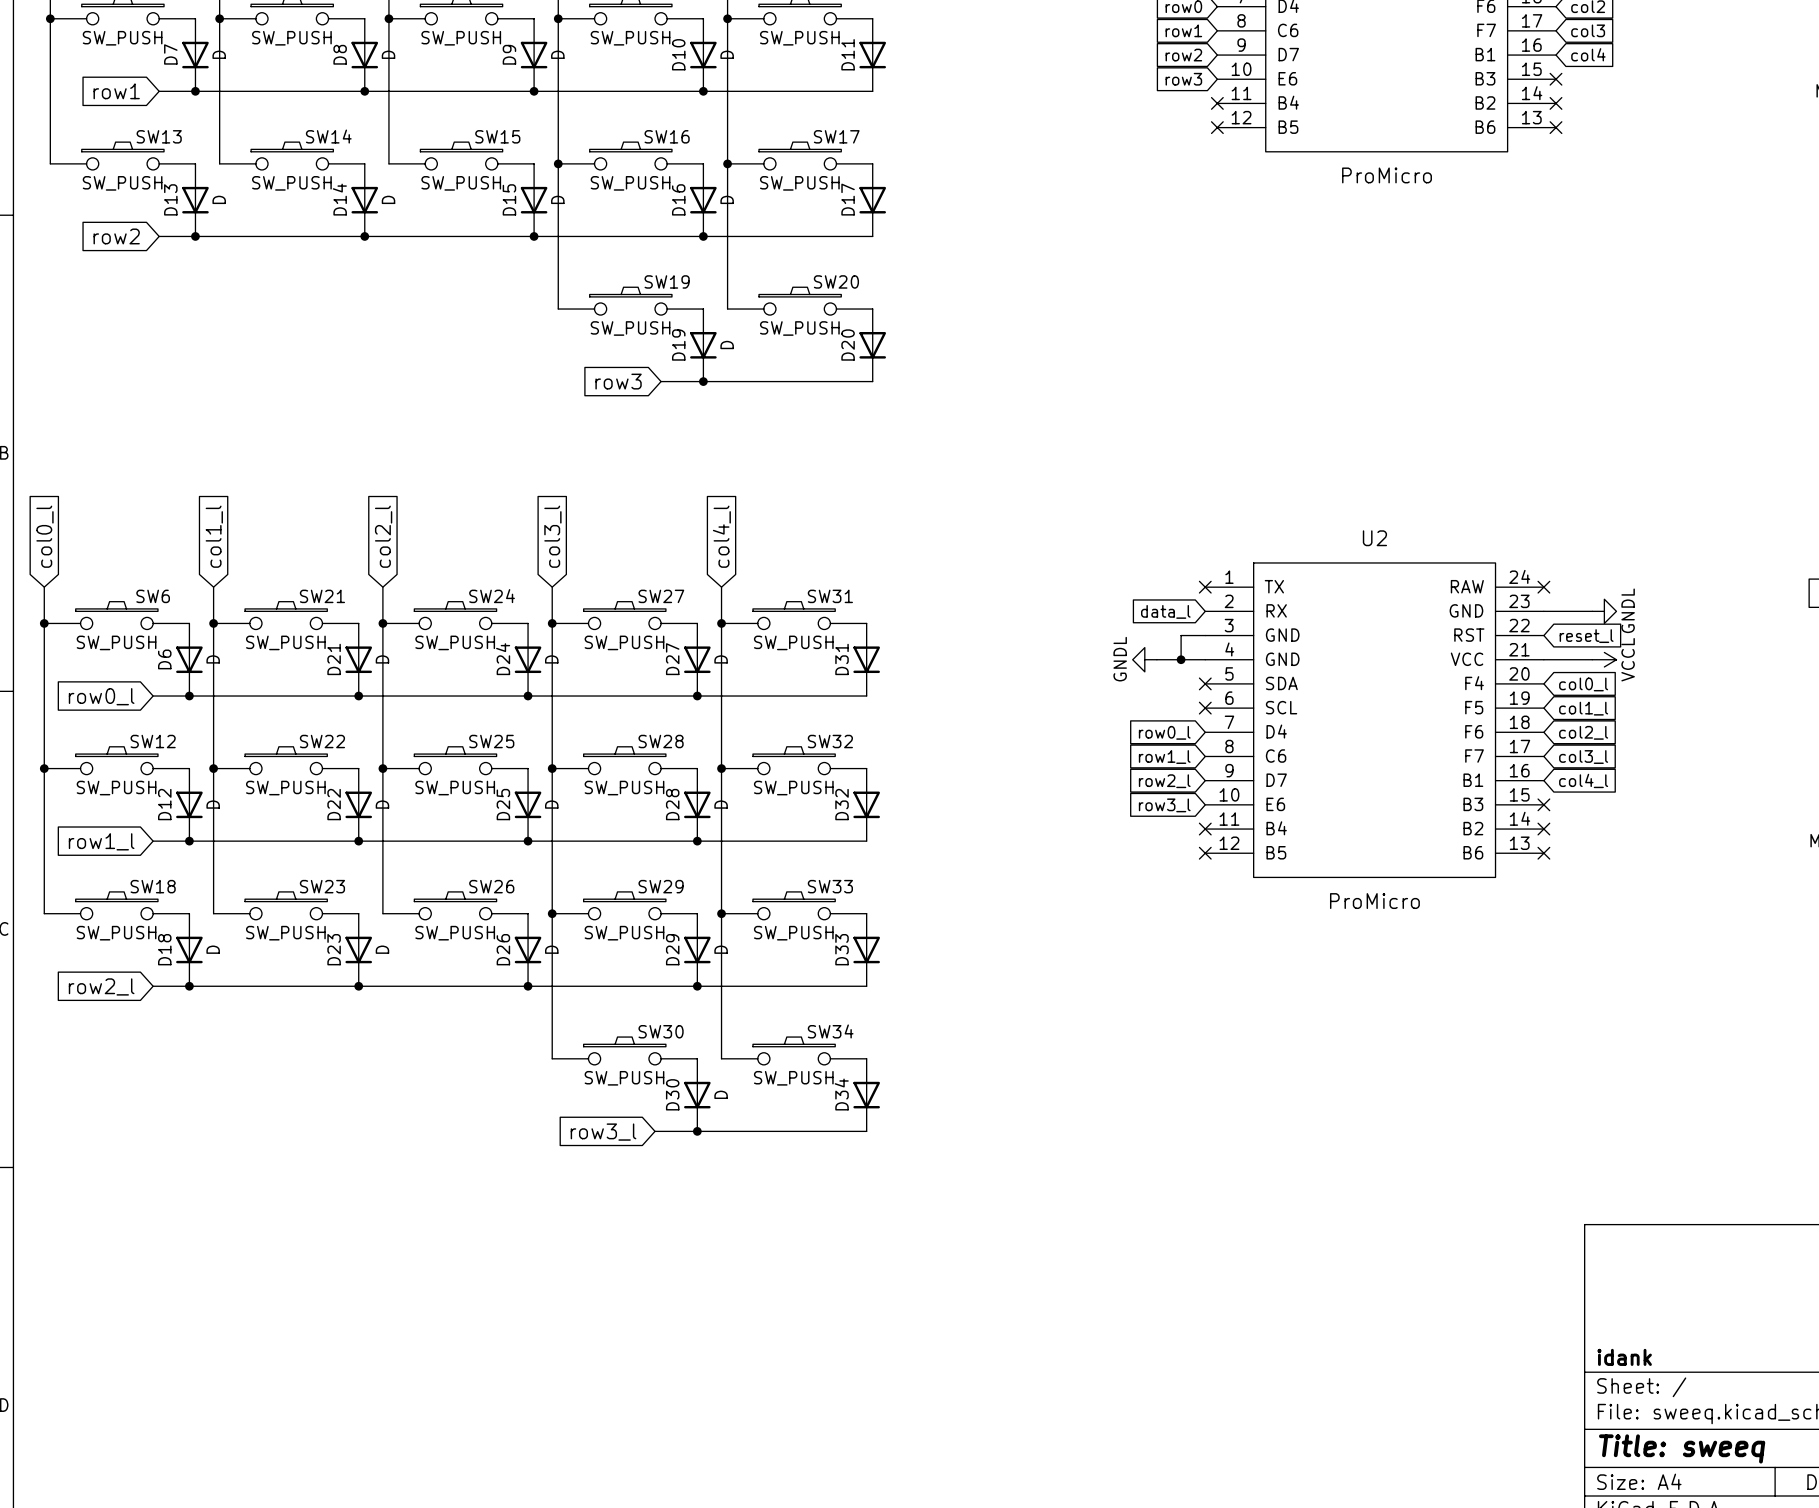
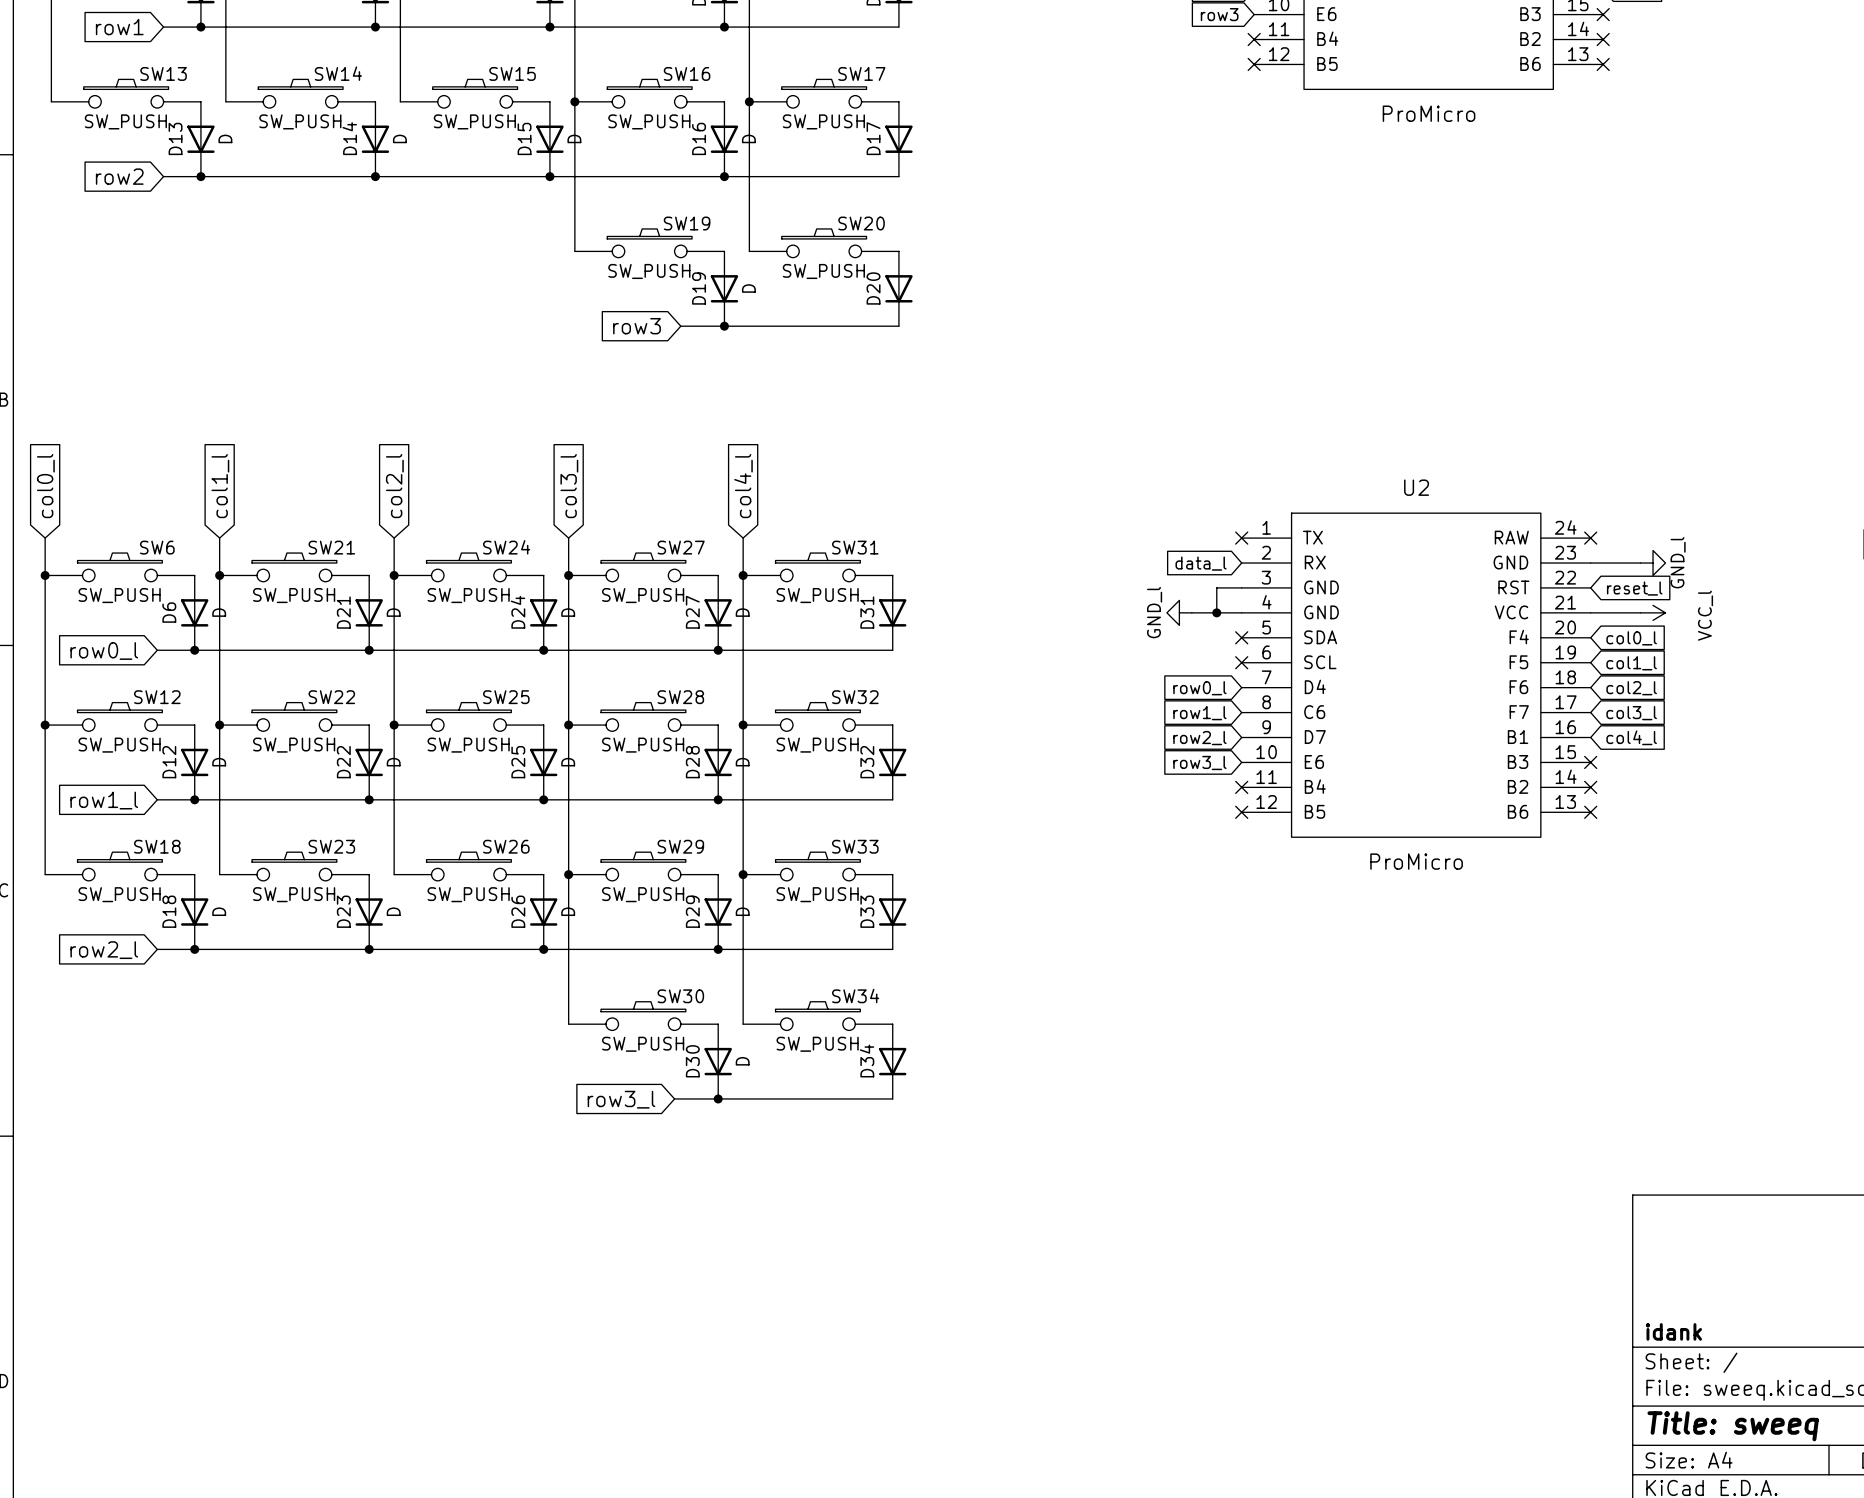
power symbol: GNDL (1604, 611) -> GND_l (1653, 563)
power symbol: GNDL (1144, 659) -> GND_l (1179, 612)
power symbol: VCCL (1604, 659) -> VCC_l (1653, 612)

